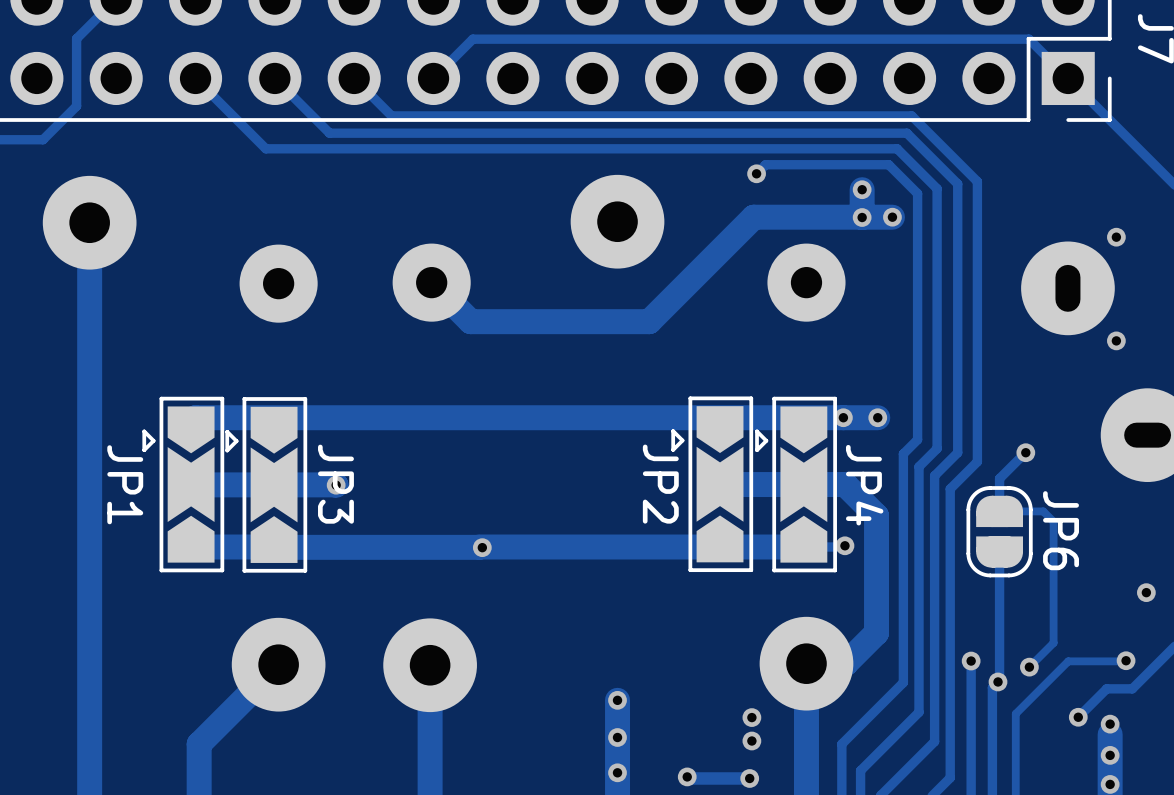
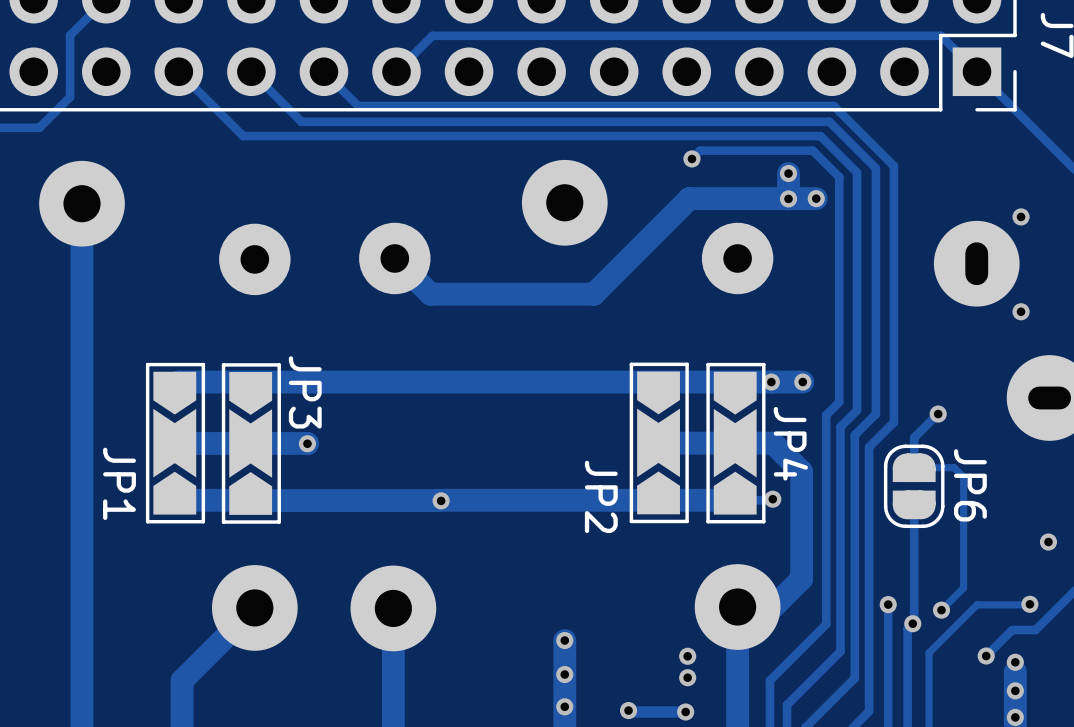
JP1 footprint: [142, 396, 225, 573] -> [145, 362, 206, 524]
JP2 footprint: [671, 396, 754, 573] -> [629, 362, 689, 524]
JP4 footprint: [755, 396, 837, 573] -> [706, 362, 766, 524]
JP3 footprint: [225, 397, 308, 573] -> [221, 363, 281, 524]
JP1 name position: JP1 (125, 484) -> JP1 (119, 483)
JP3 name position: JP3 (335, 484) -> JP3 (305, 392)
JP2 name position: JP2 (660, 484) -> JP2 (601, 496)

